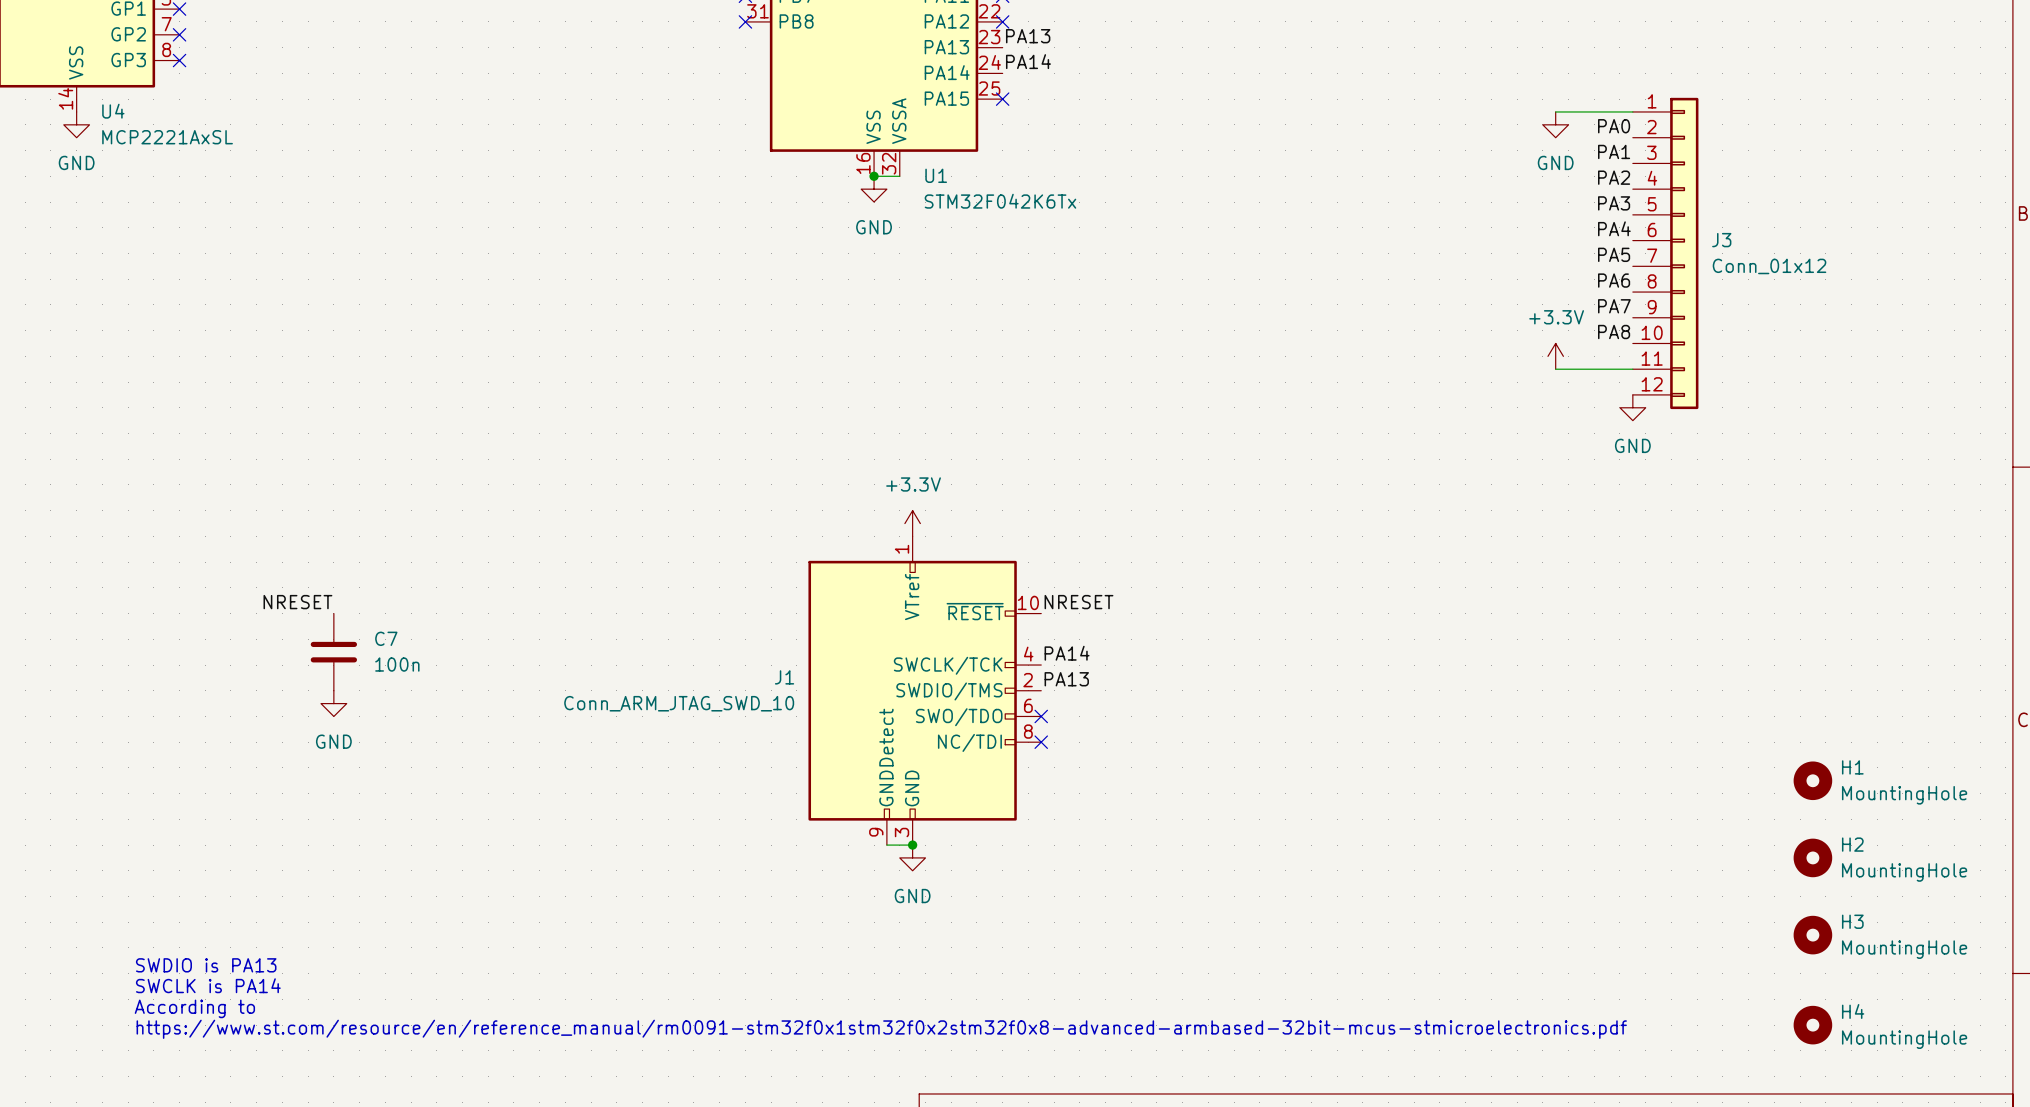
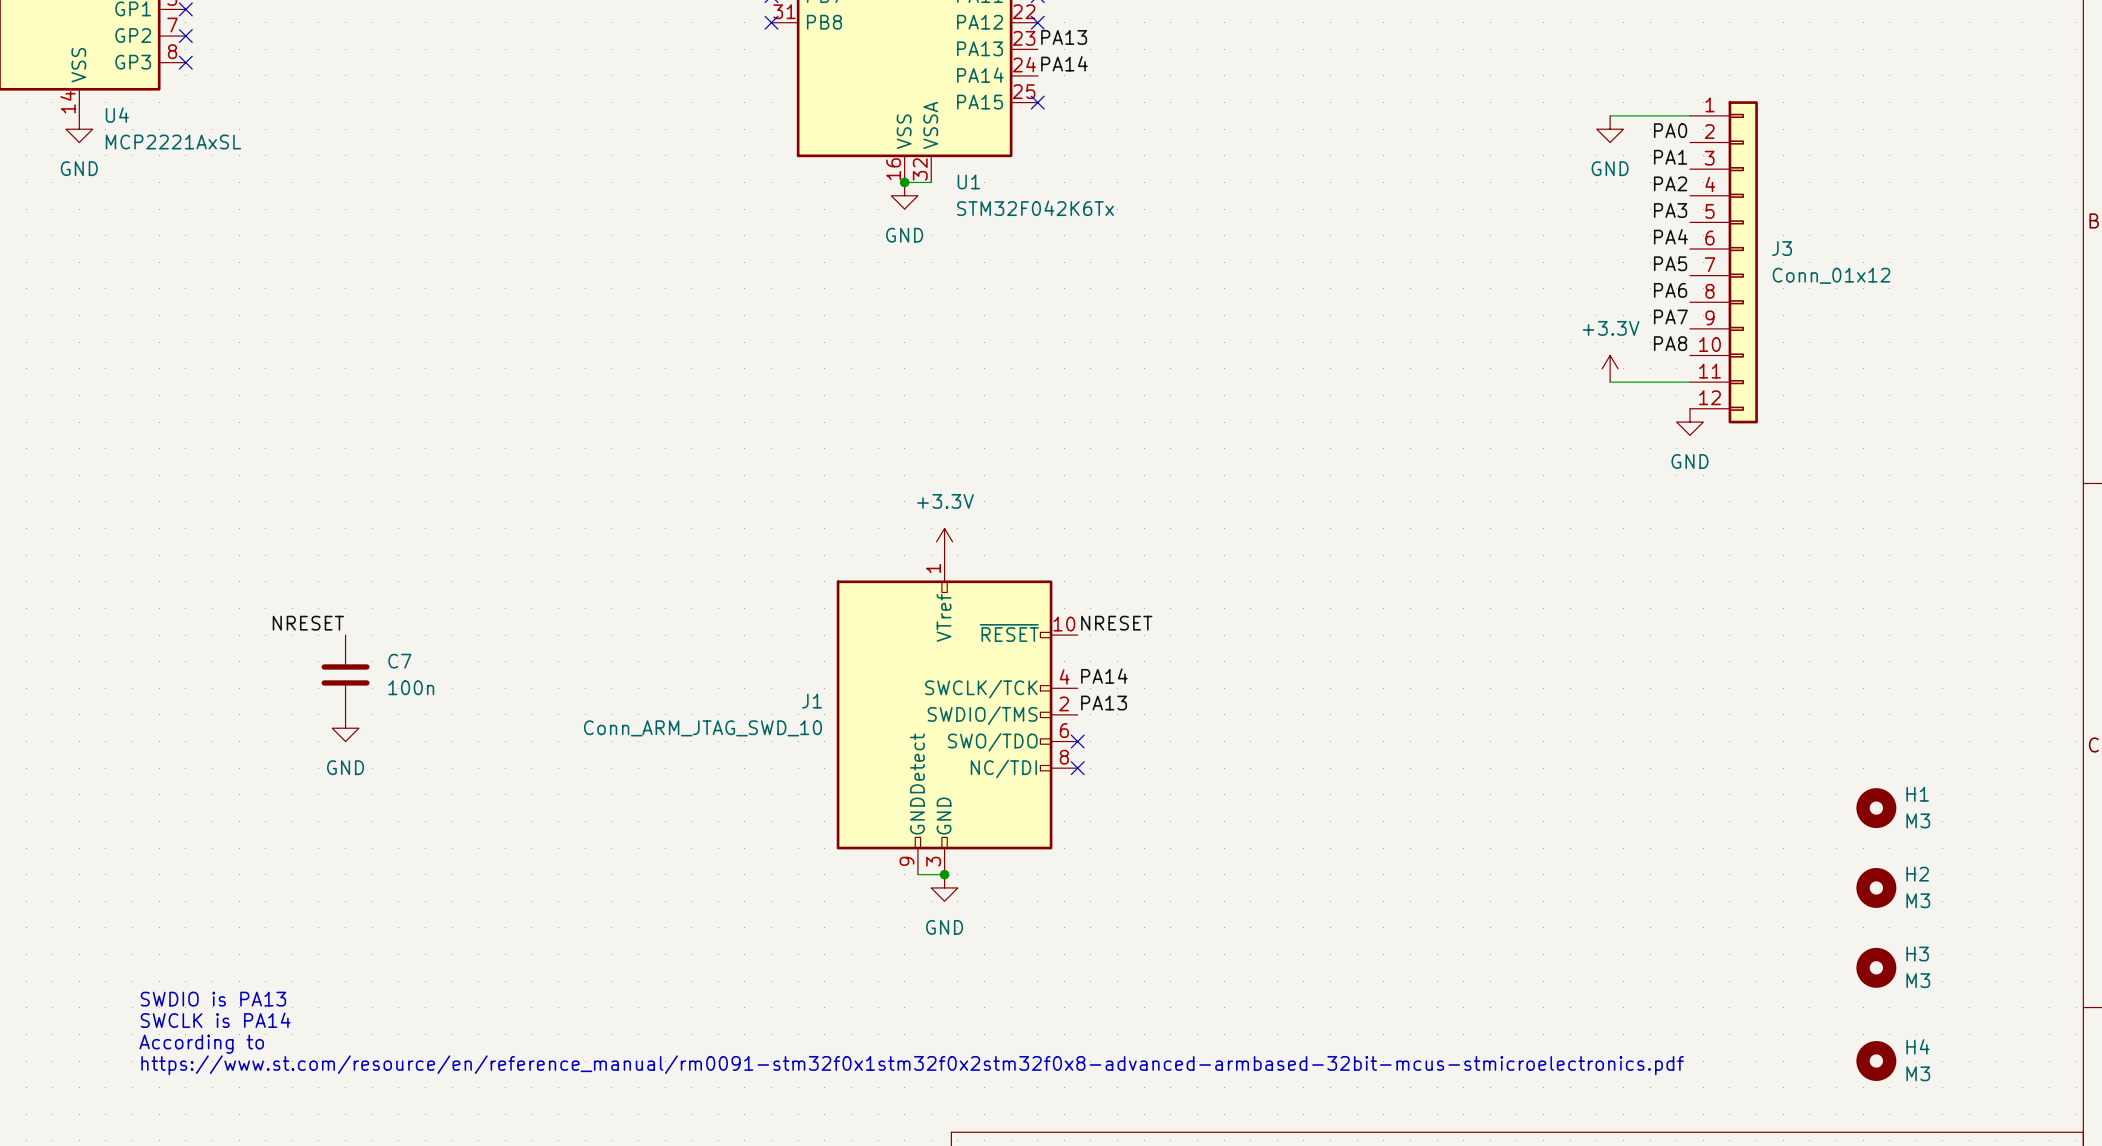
H1 value: MountingHole (1904, 795) -> M3 (1918, 820)
H2 value: MountingHole (1904, 872) -> M3 (1918, 900)
H3 value: MountingHole (1904, 949) -> M3 (1918, 980)
H4 value: MountingHole (1904, 1039) -> M3 (1918, 1073)

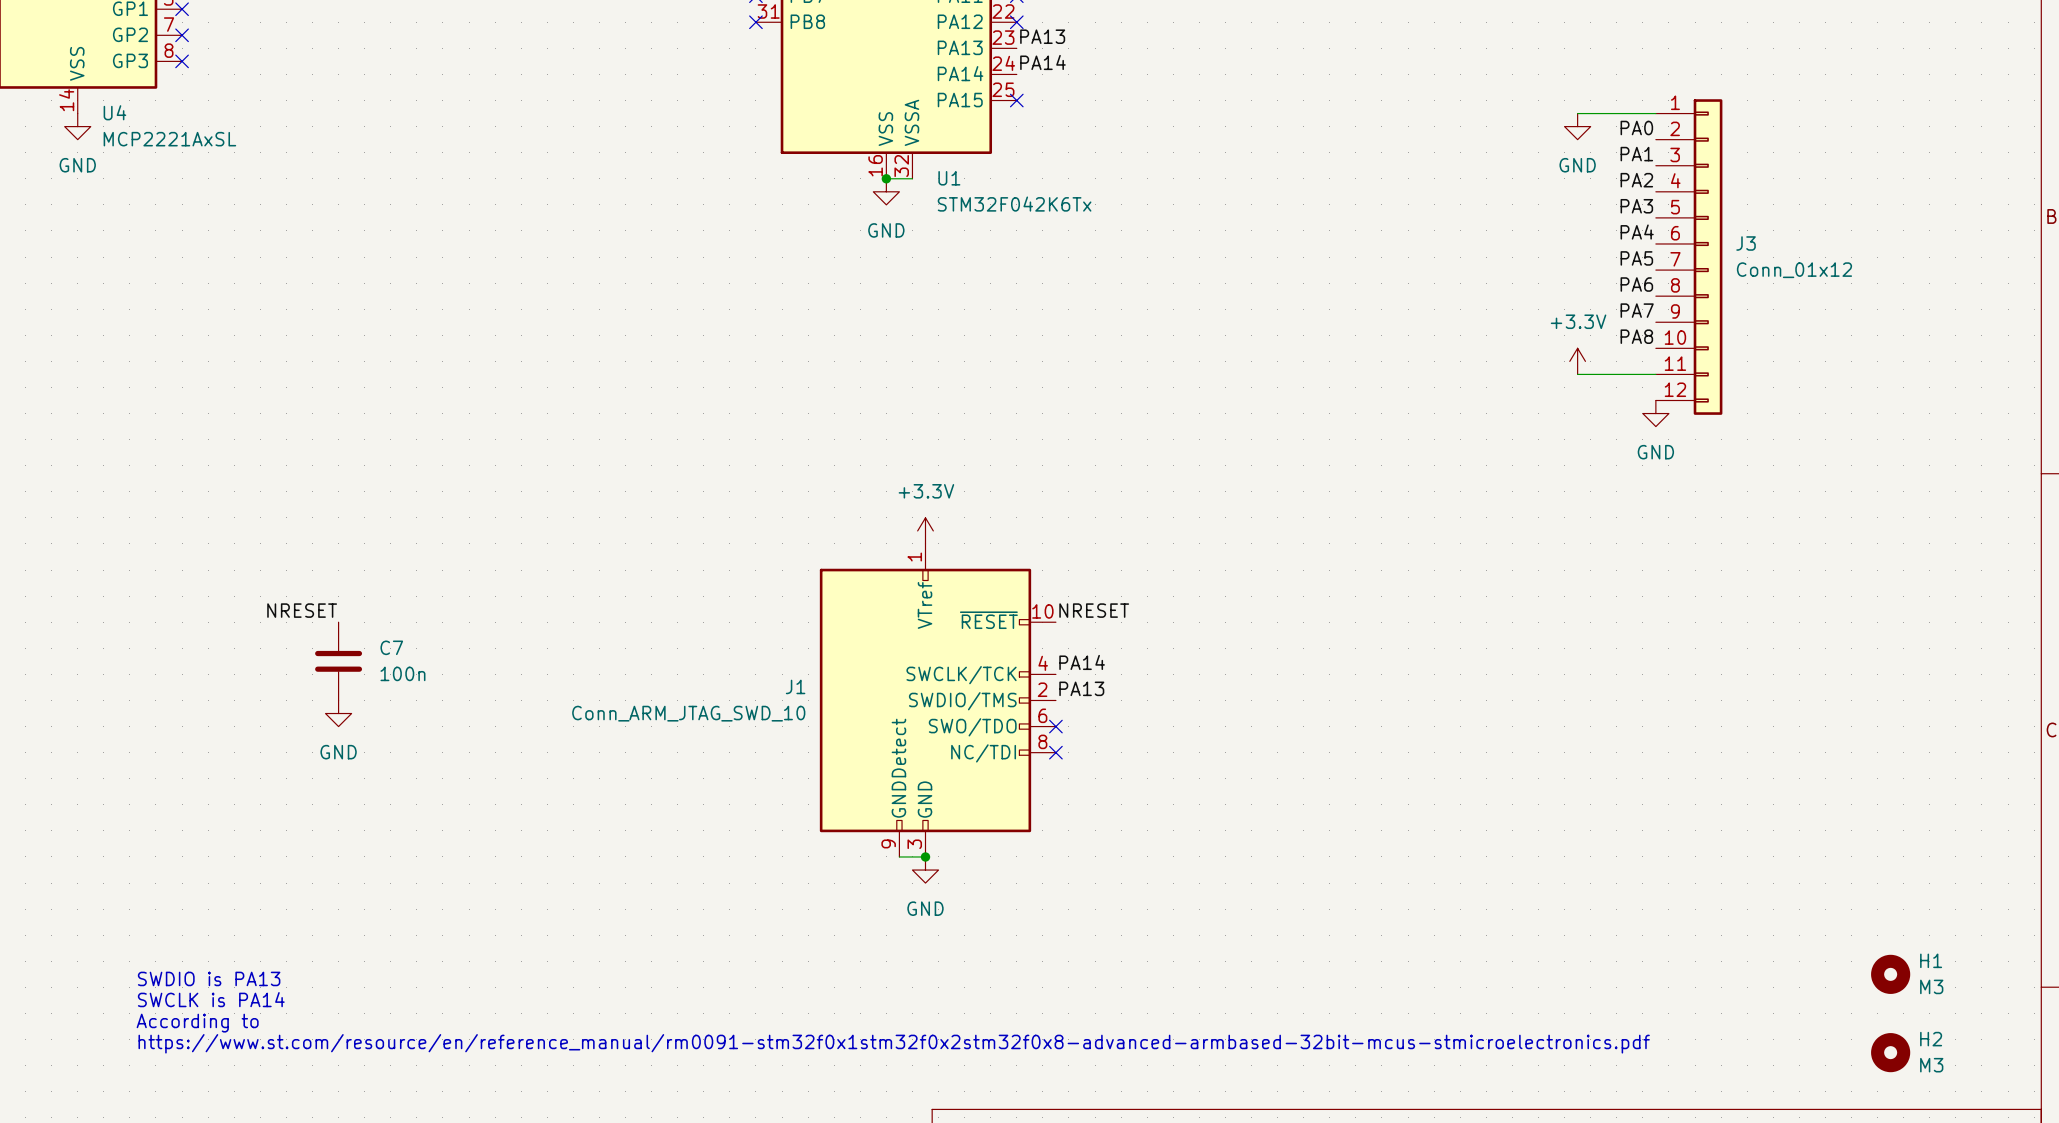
H1 position: (1876, 808) -> (1890, 974)
H2 position: (1876, 887) -> (1890, 1052)
H3: M3 (1876, 967) -> none
H4: M3 (1876, 1061) -> none

